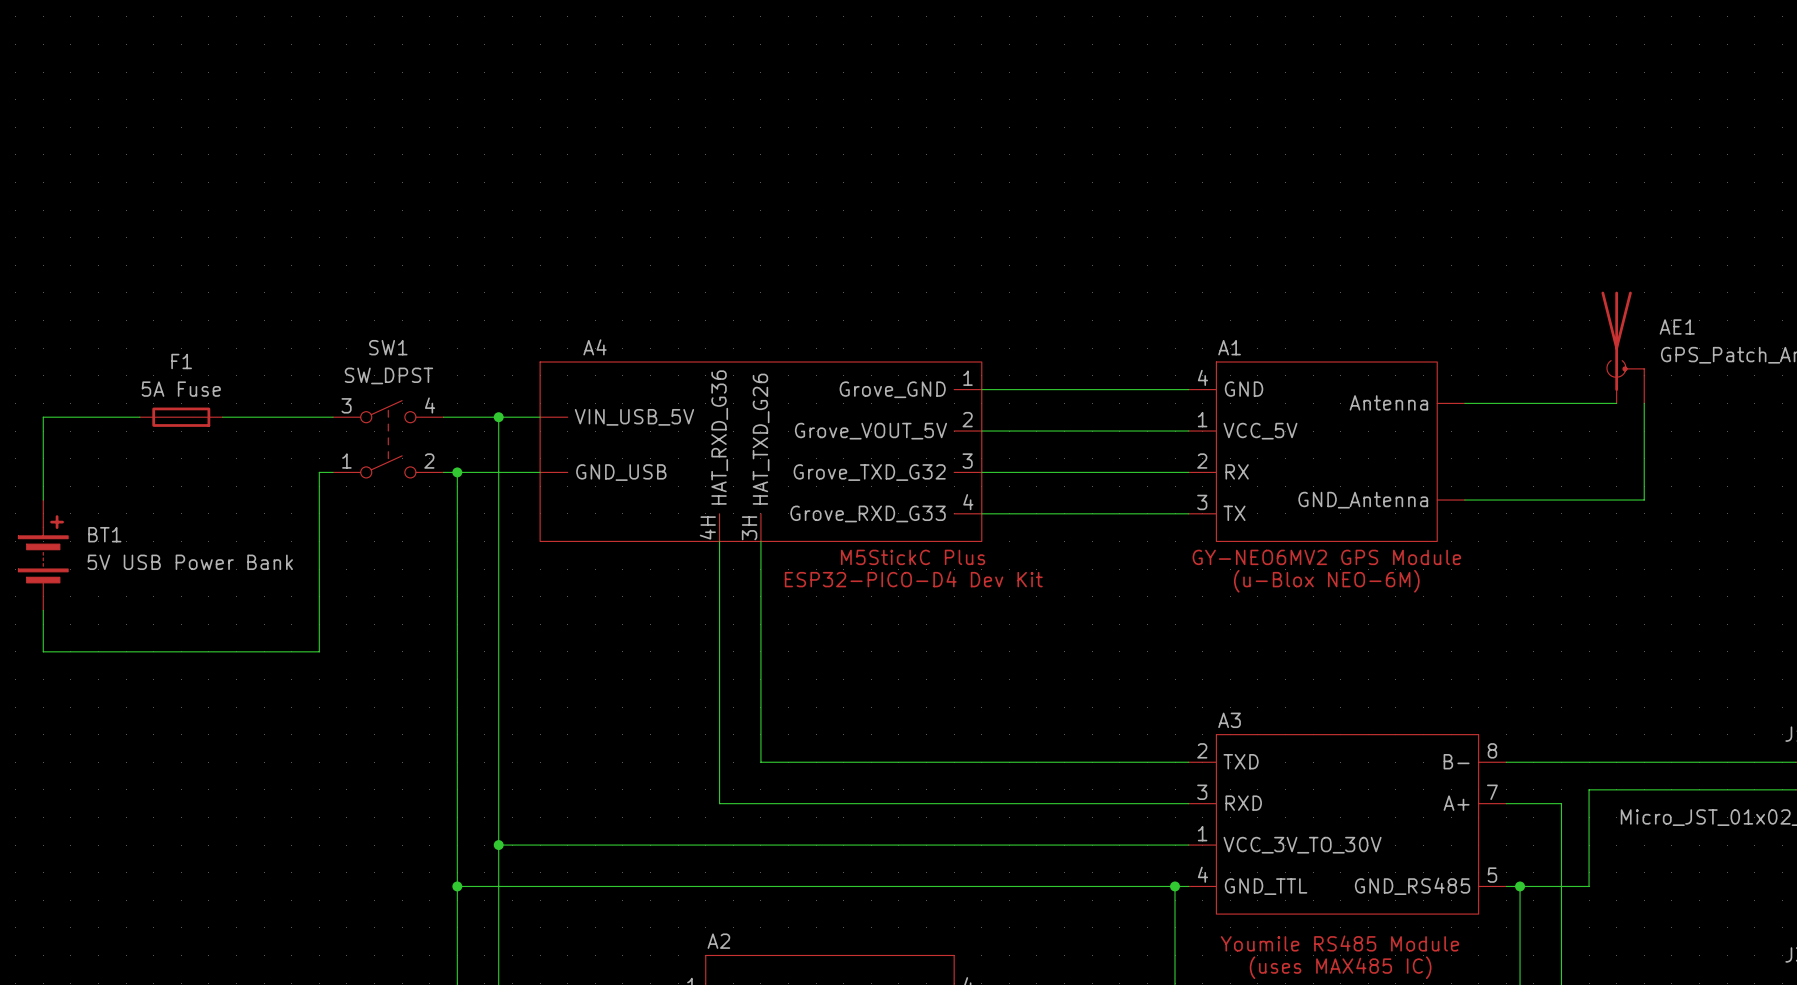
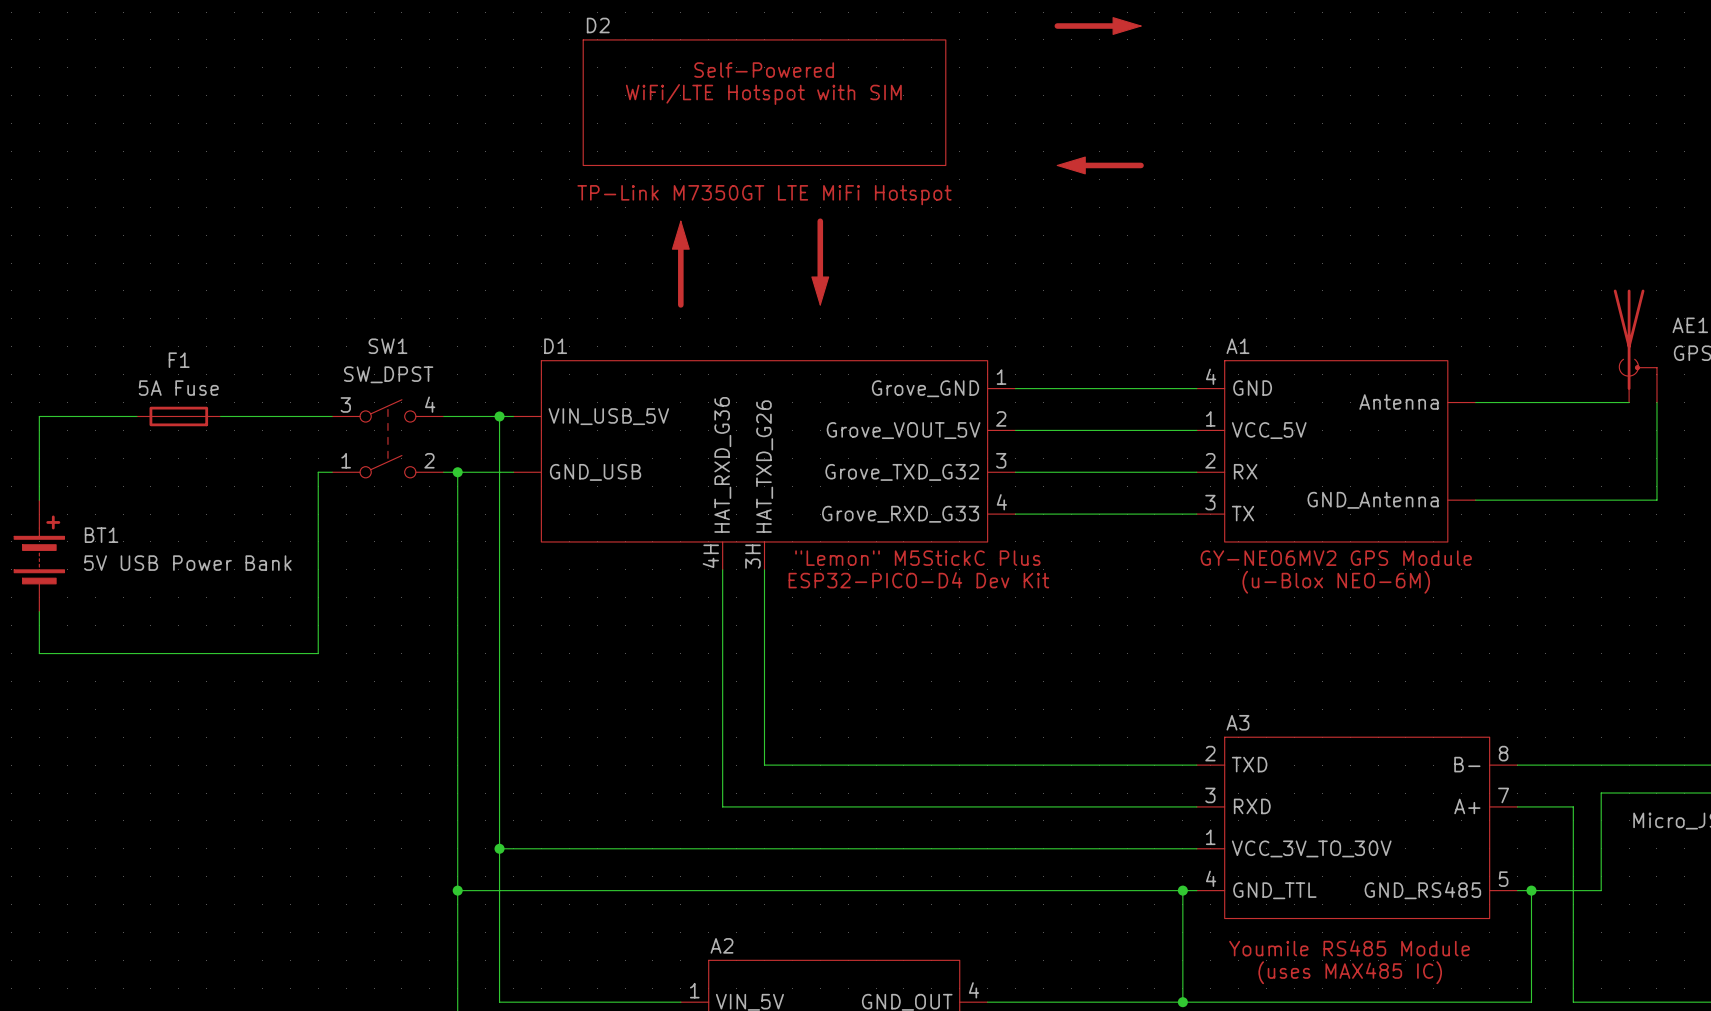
power symbol: none -> (1097, 26)
D2: none -> (764, 102)
power symbol: none -> (1100, 165)
power symbol: none -> (820, 261)
power symbol: none -> (680, 264)
A4: (760, 451) -> none
D1: none -> (764, 465)

